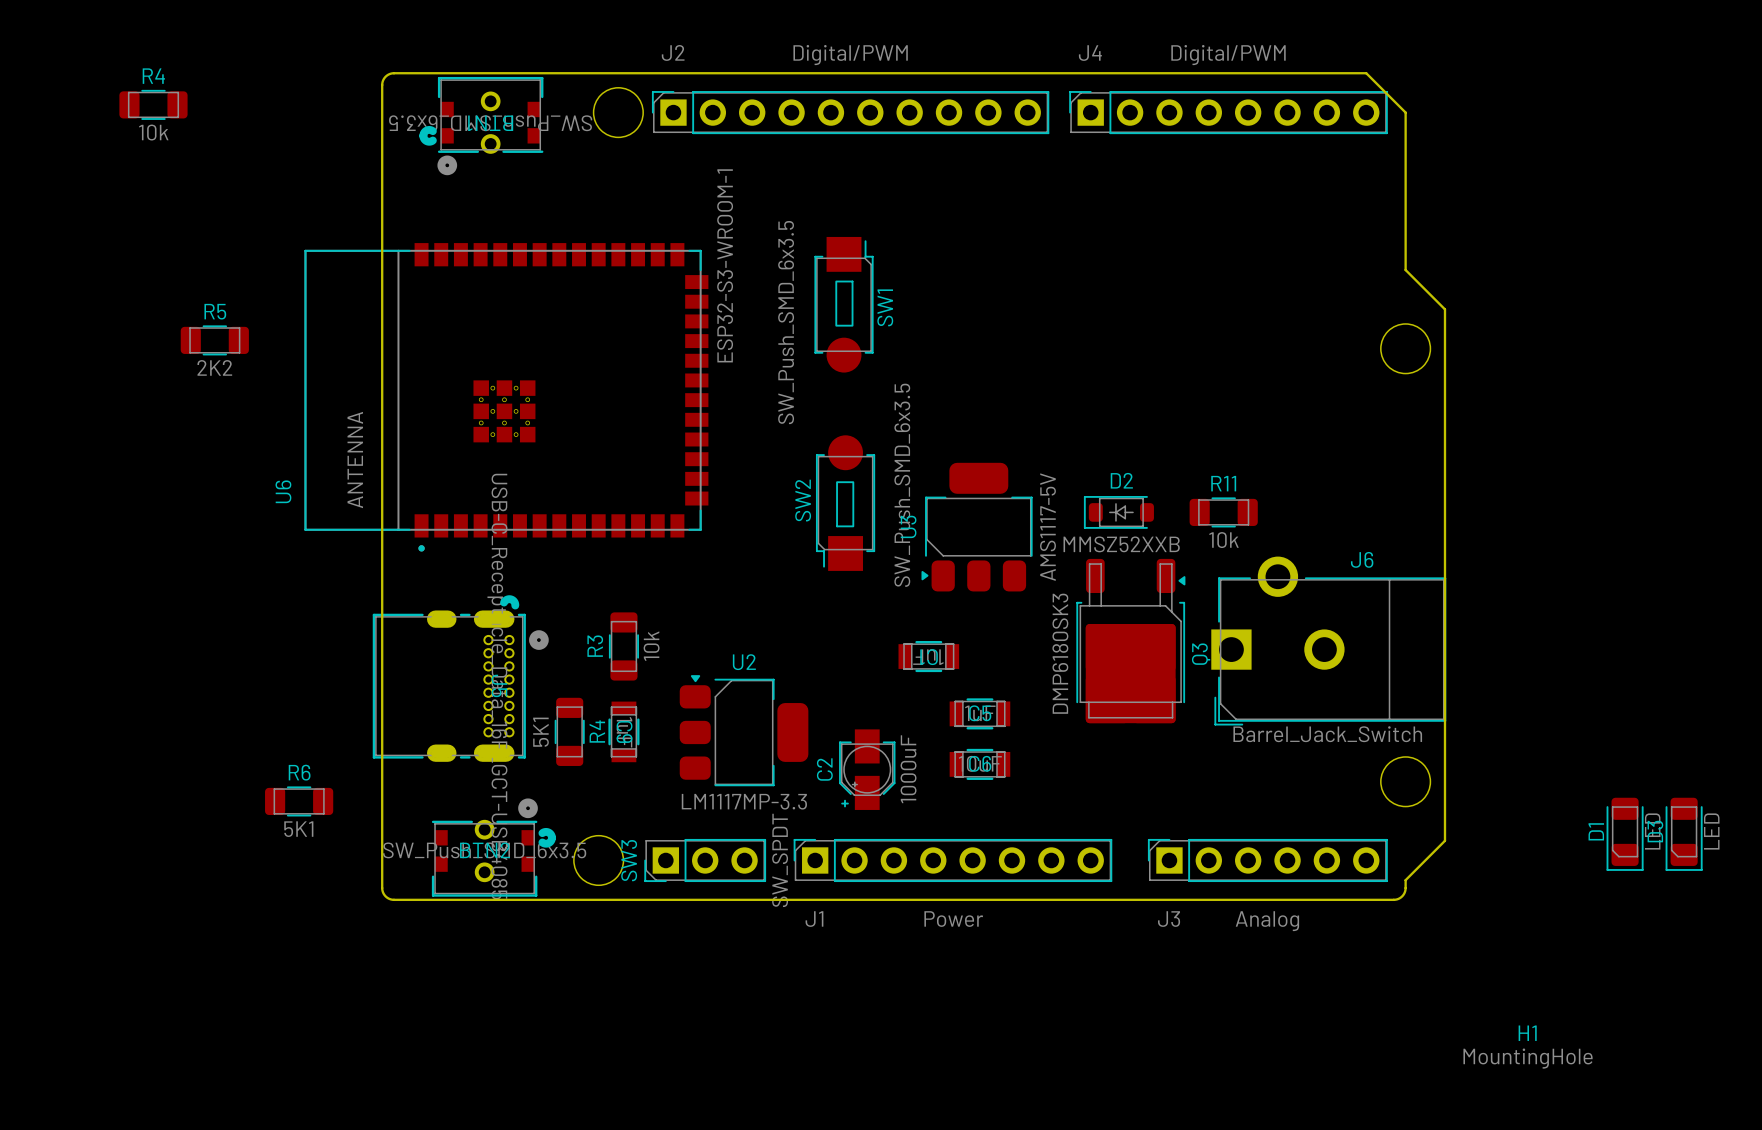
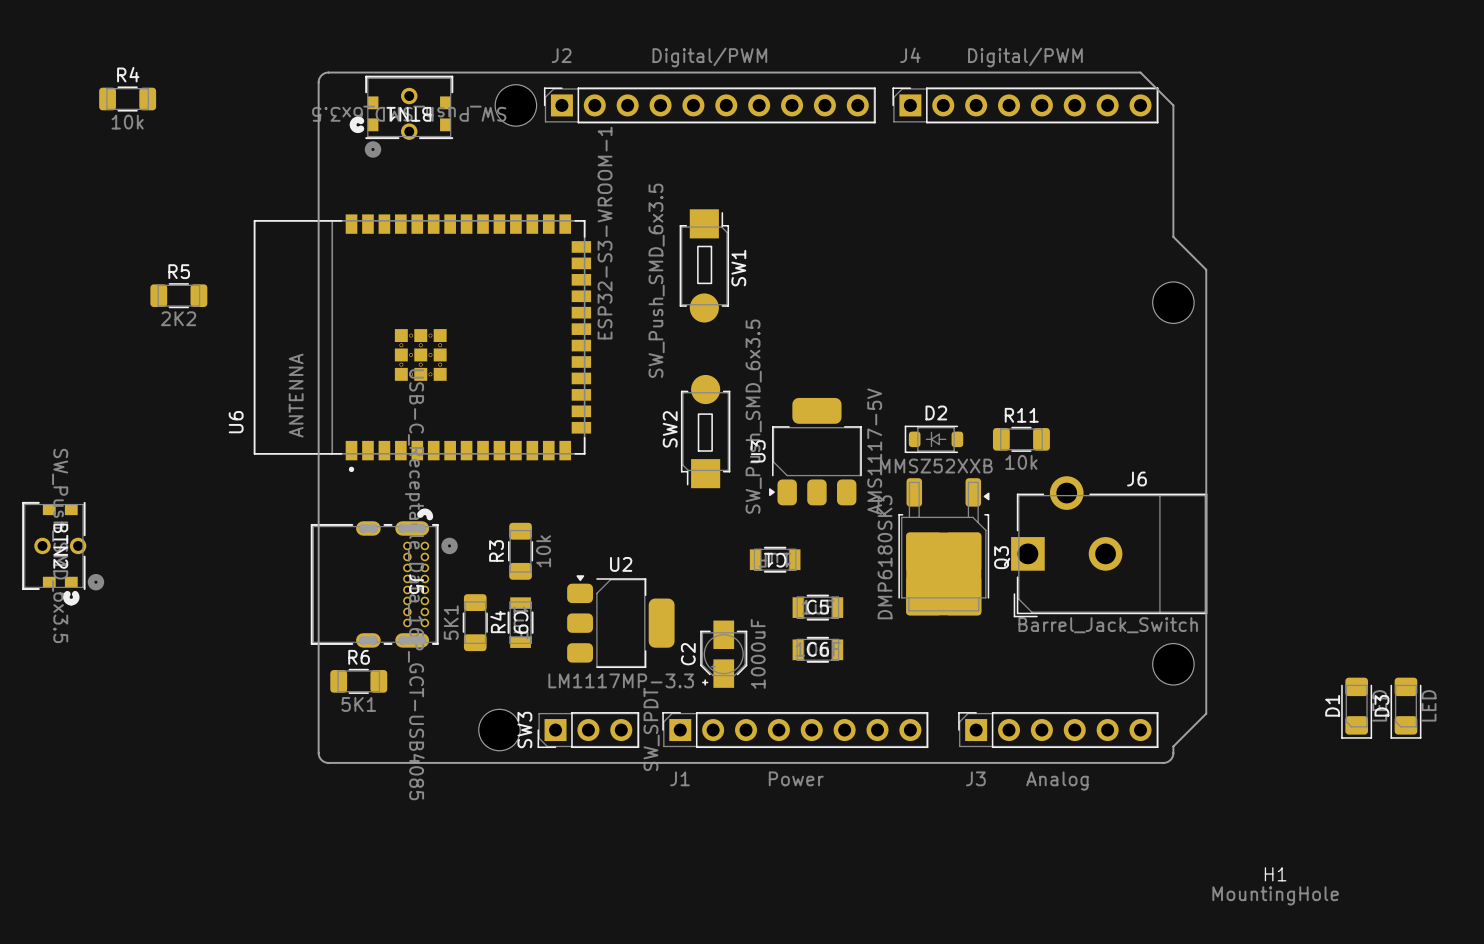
R6 position: (299, 801) -> (358, 681)
BTN2 rotation: 0° (493, 847) -> 90° clockwise (63, 553)
BTN2 position: (493, 847) -> (63, 553)

